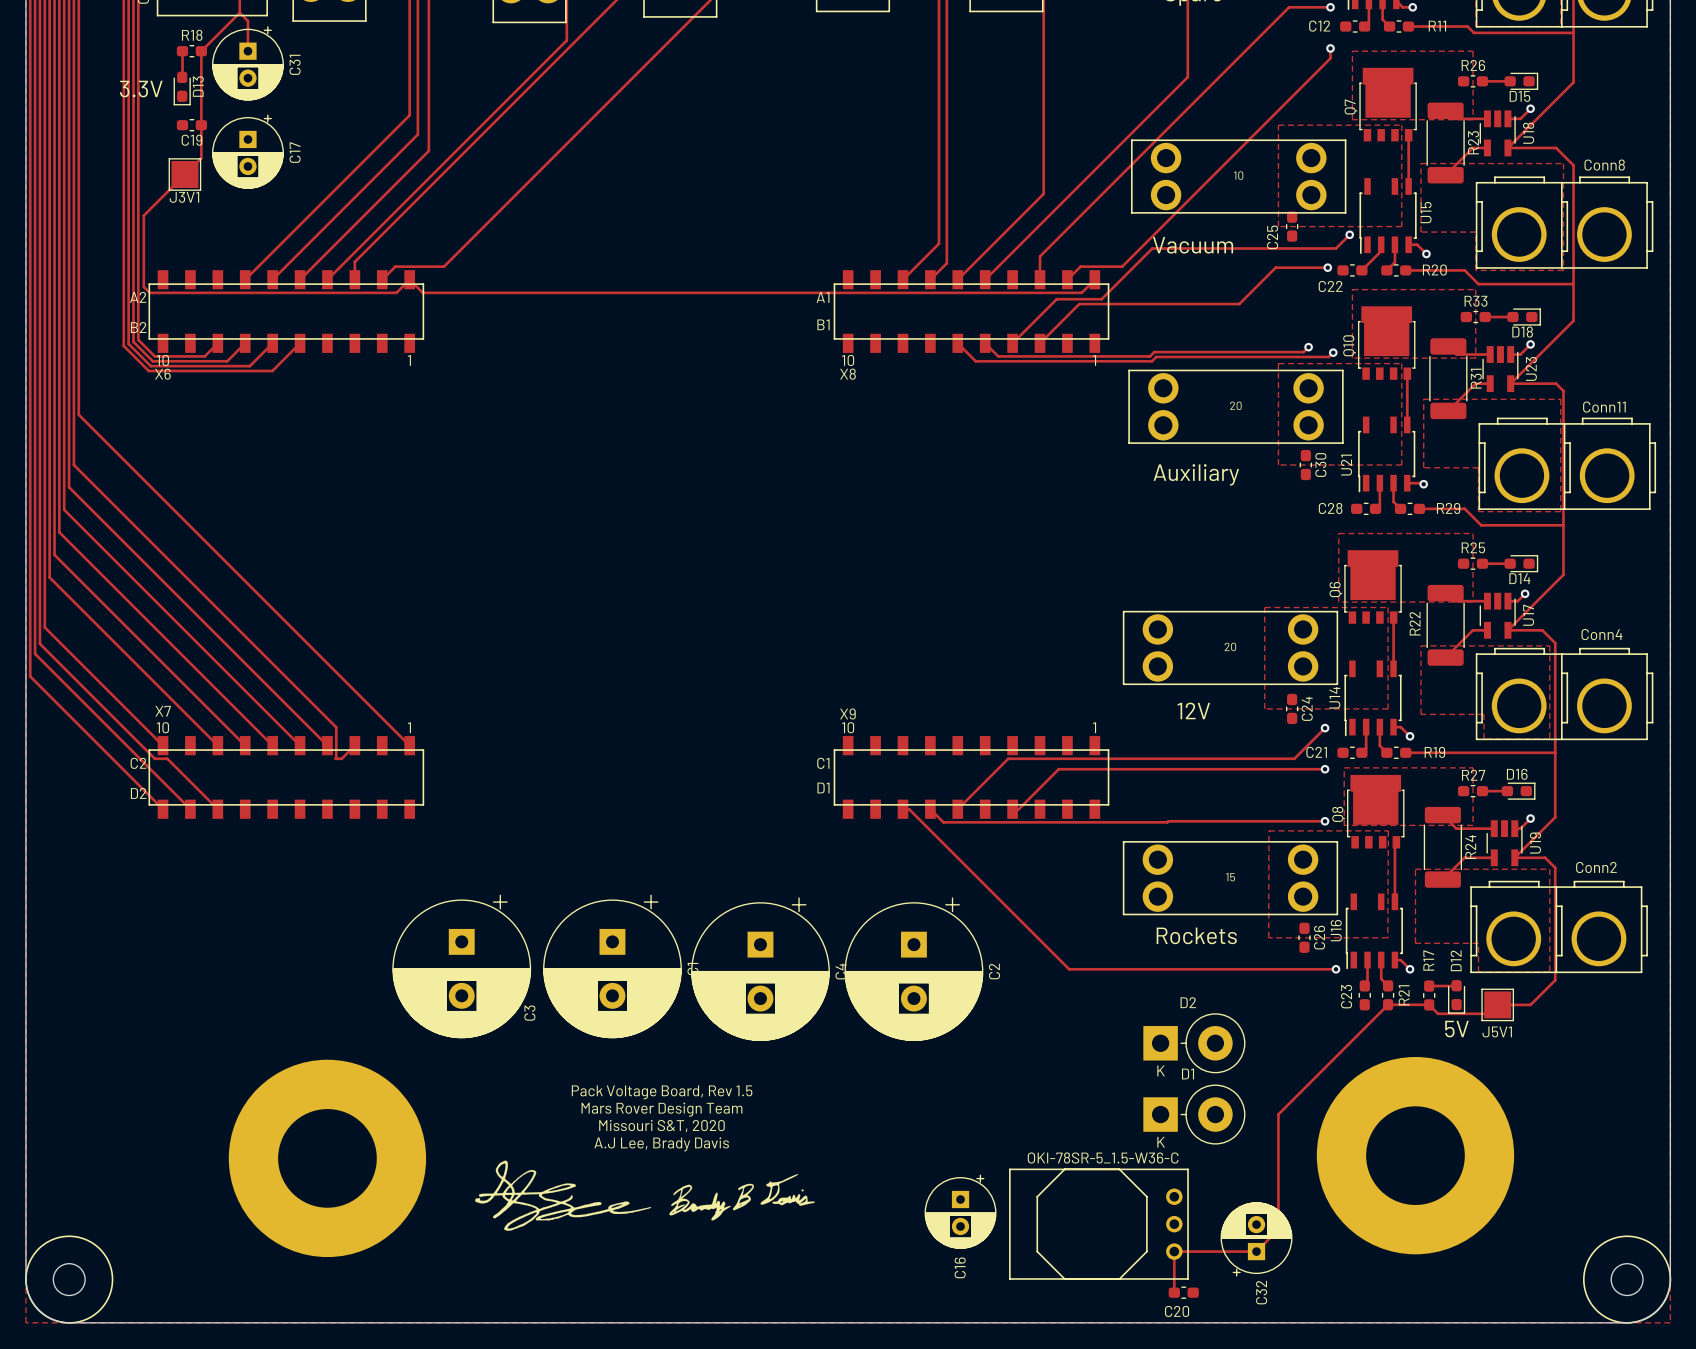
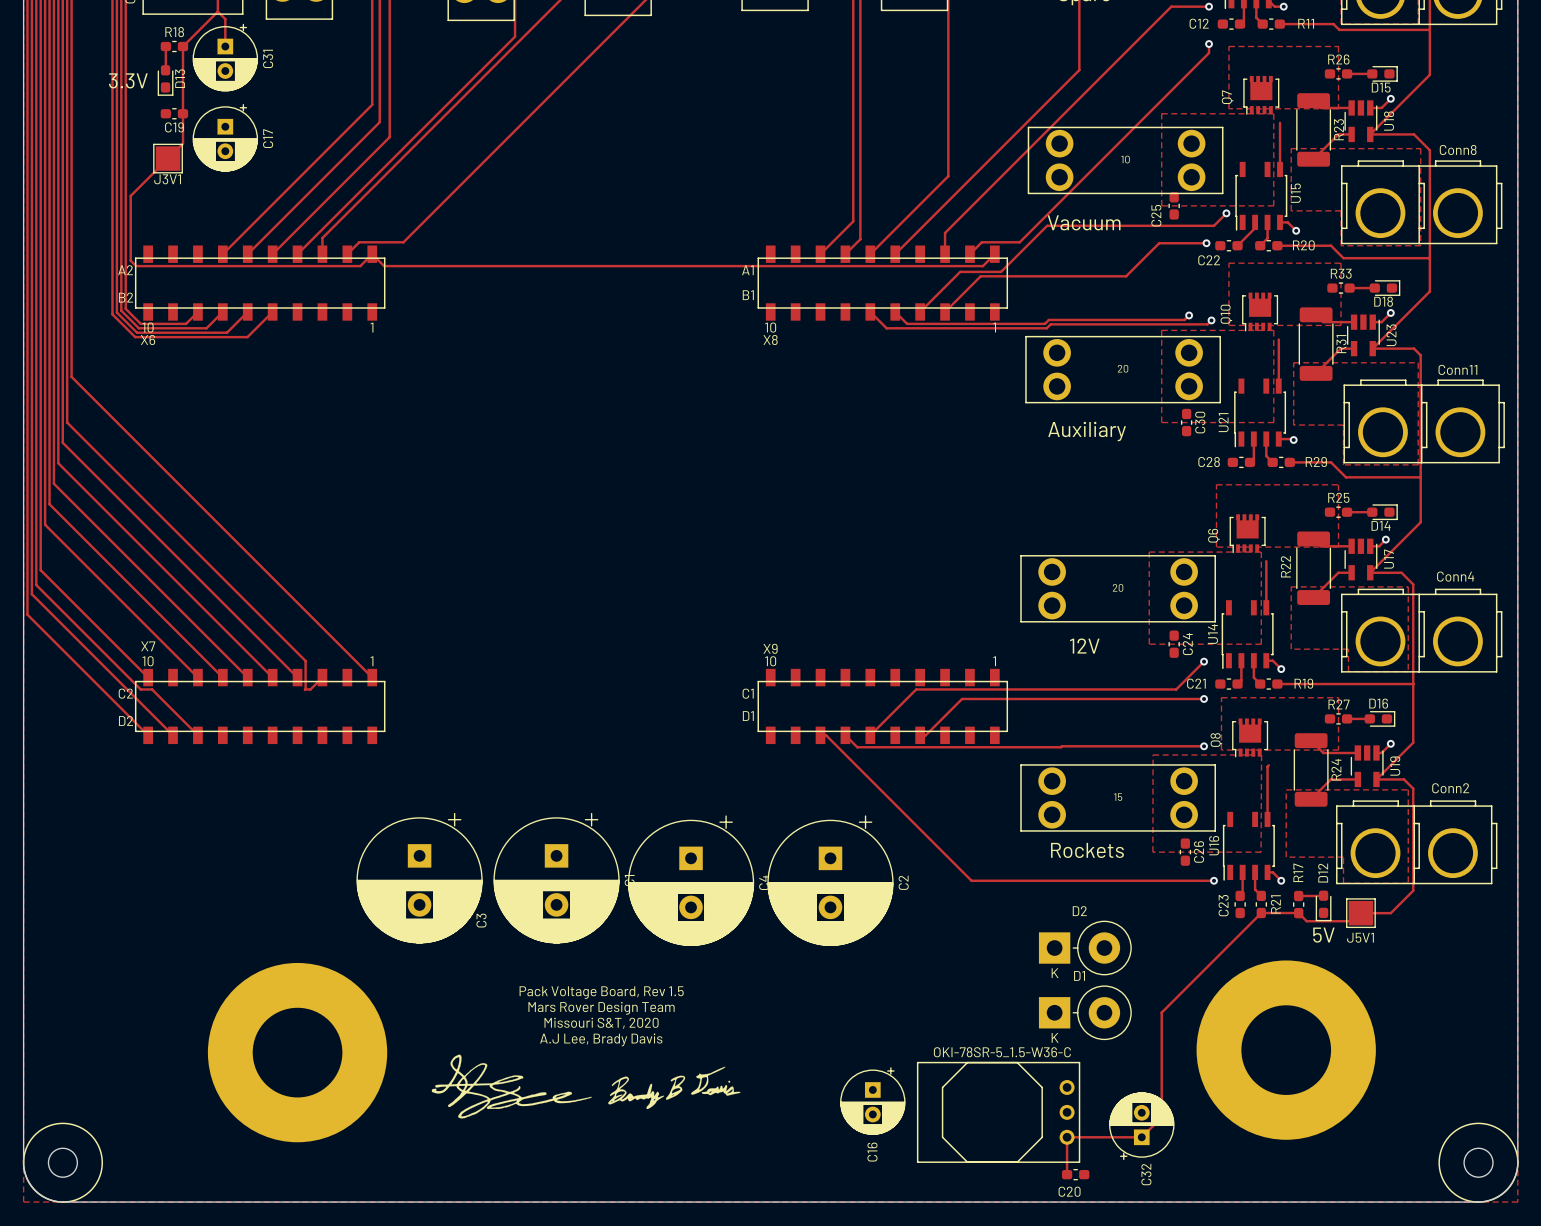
Q7 footprint: [1359, 67, 1417, 142] -> [1243, 75, 1280, 115]
Q10 footprint: [1358, 306, 1416, 380] -> [1242, 292, 1279, 332]
Q6 footprint: [1344, 550, 1402, 624] -> [1229, 514, 1266, 554]
Q8 footprint: [1347, 774, 1405, 849] -> [1232, 718, 1269, 758]

